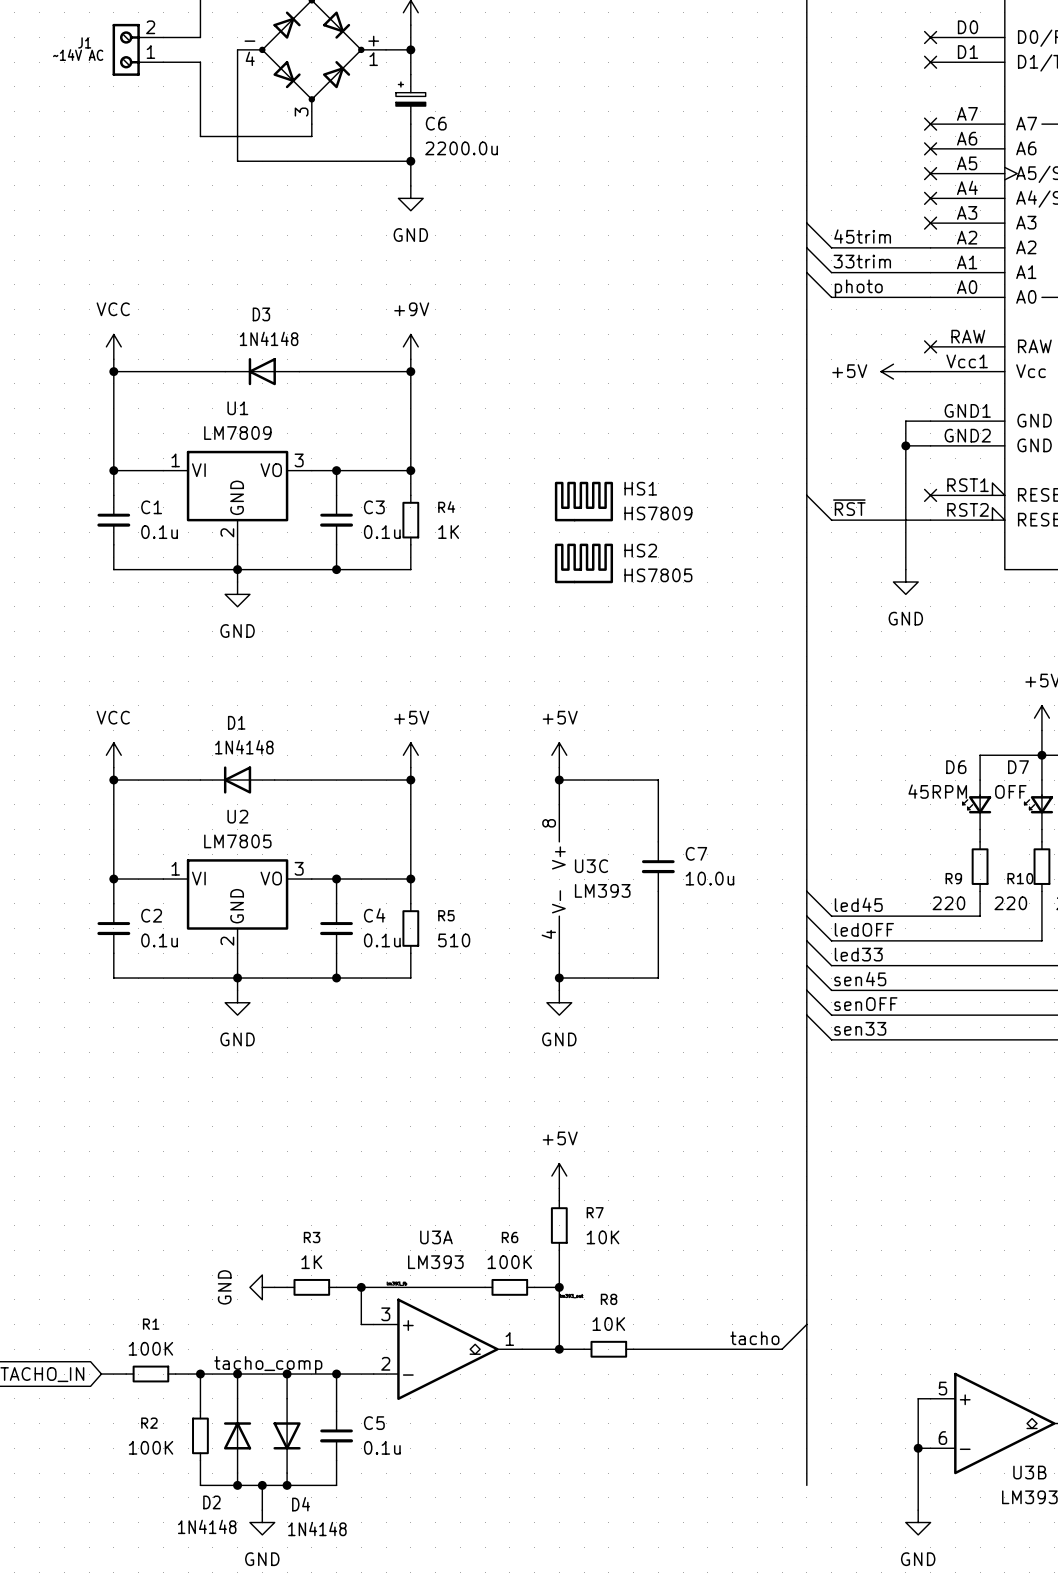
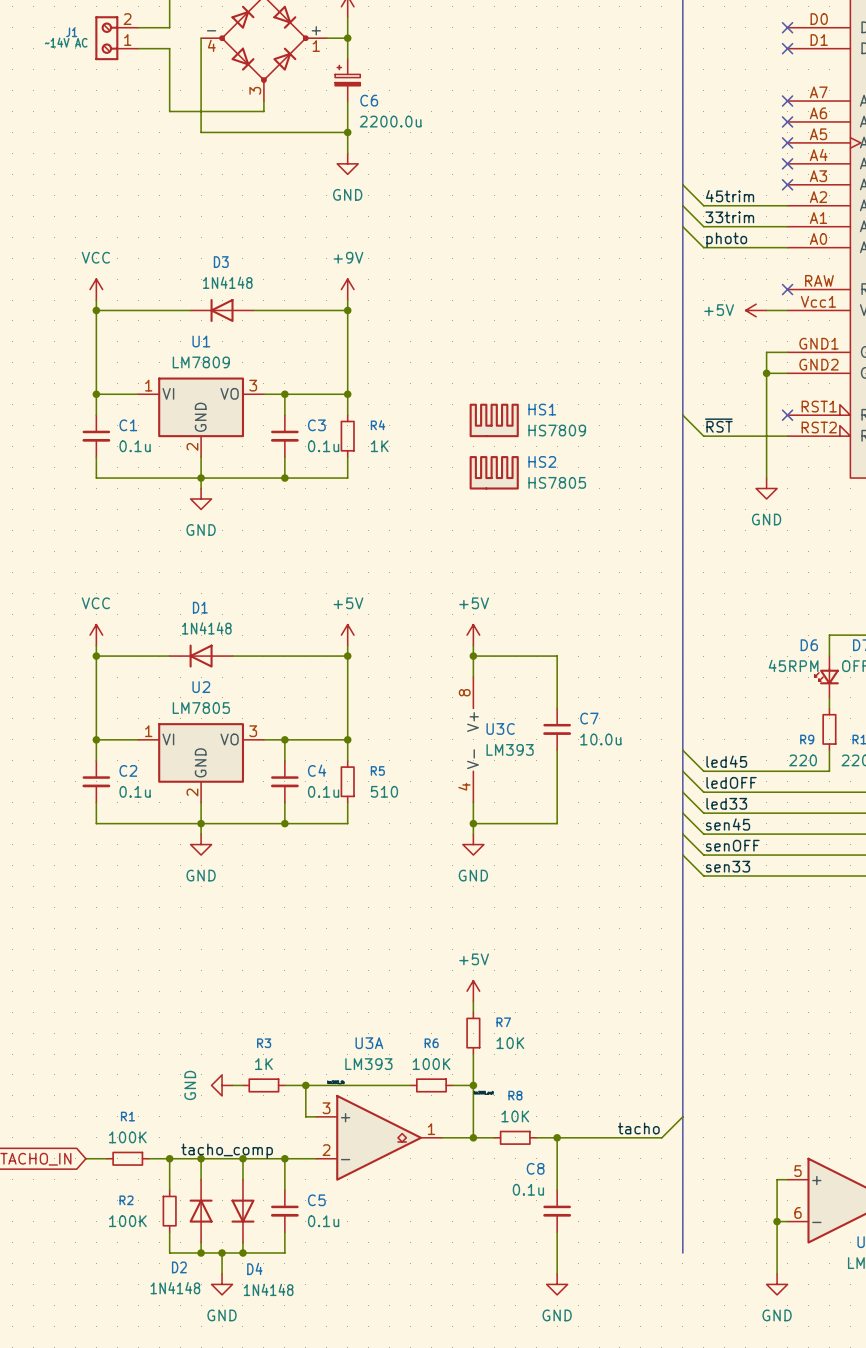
wire: none -> (557, 1137) (557, 1190)
junction: none -> (557, 1137)
C8: none -> 0.1u (557, 1211)
wire: none -> (557, 1232) (557, 1273)
power symbol: none -> GND (557, 1284)

